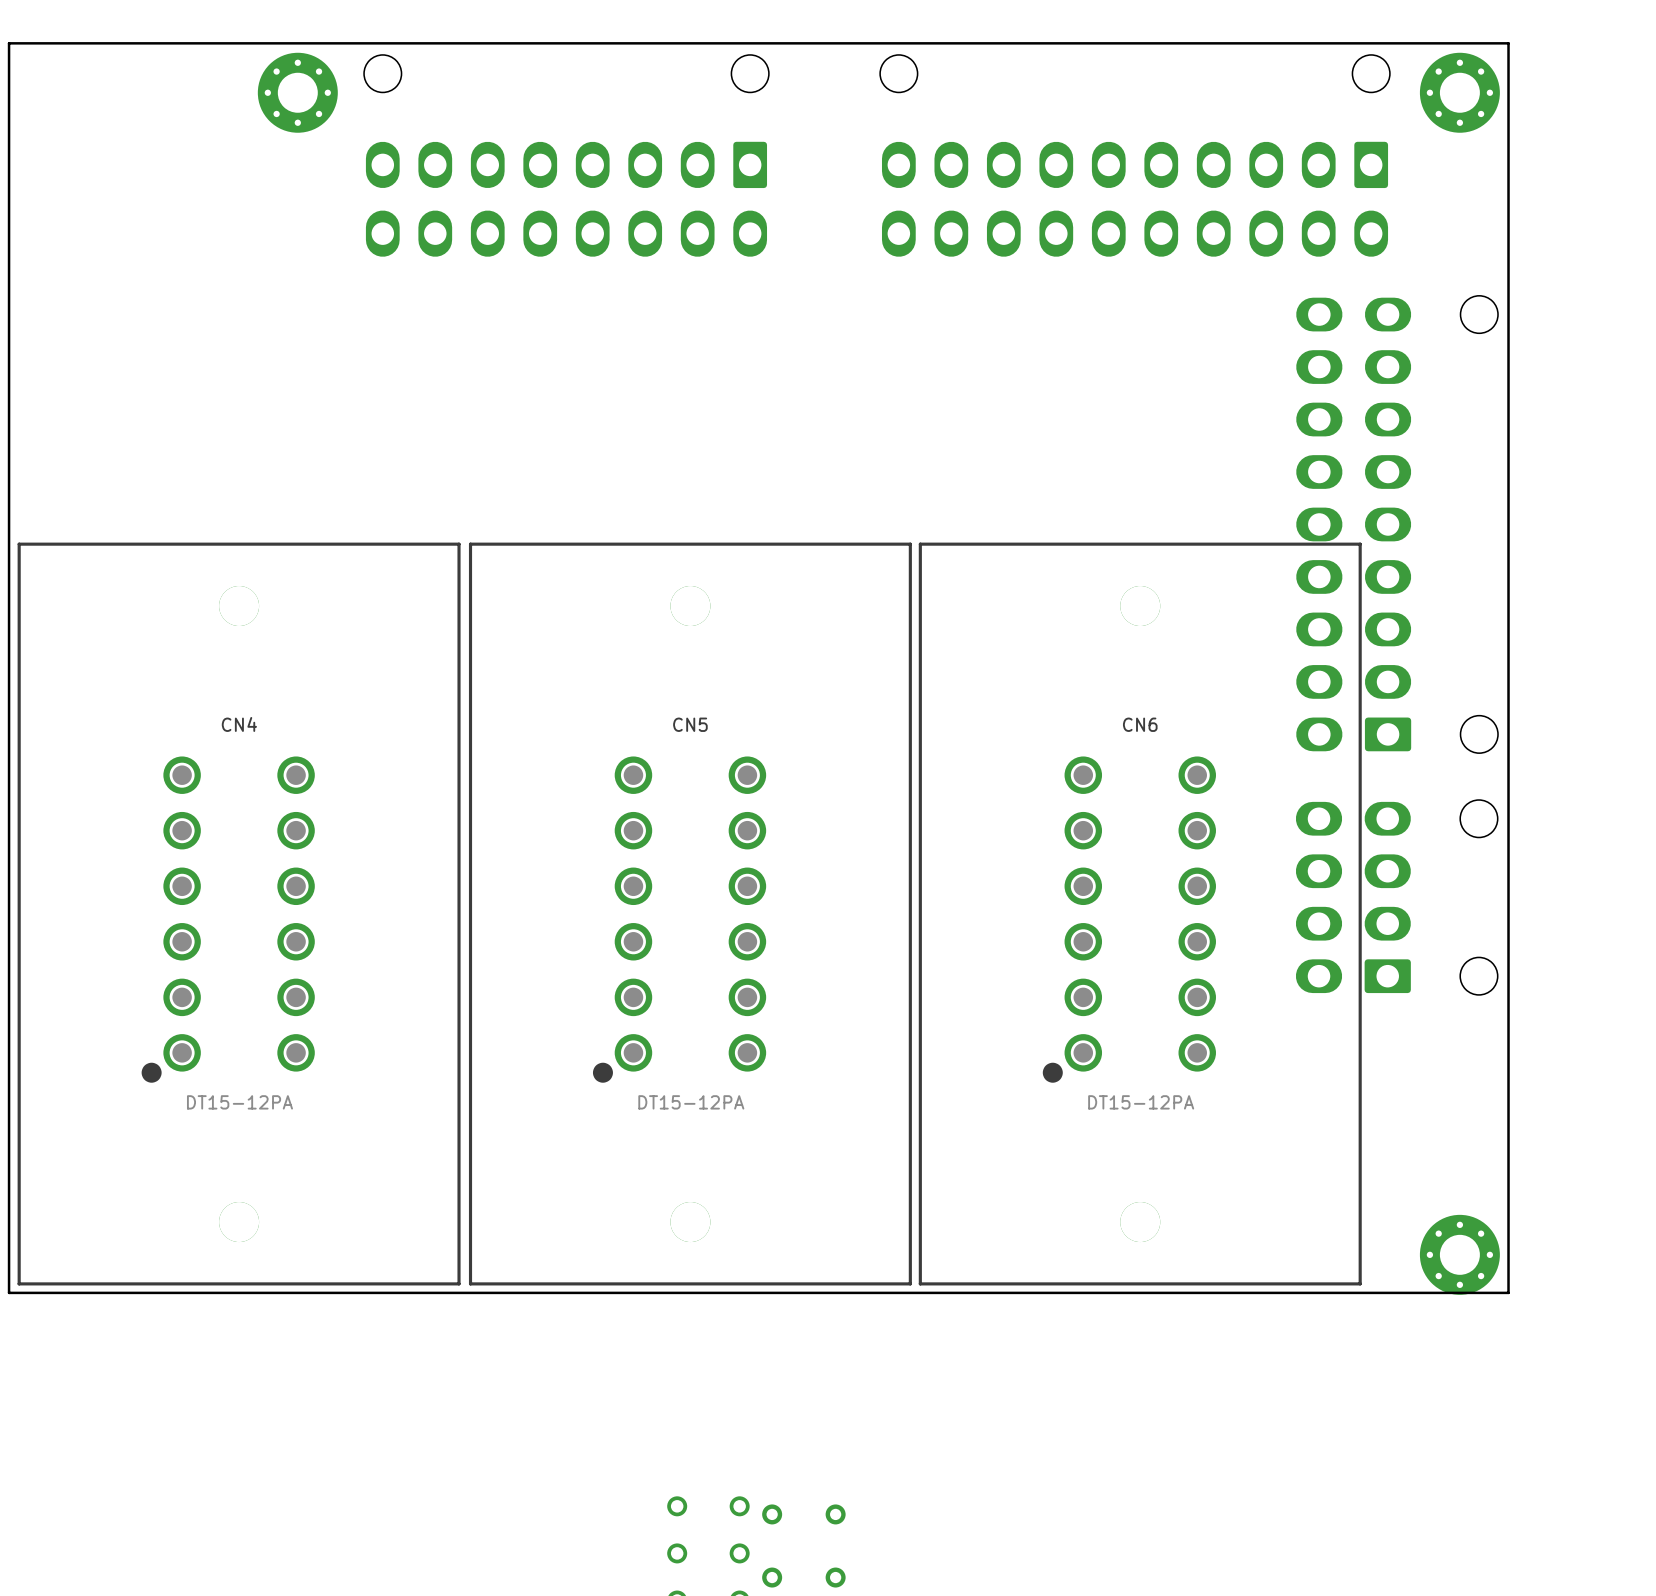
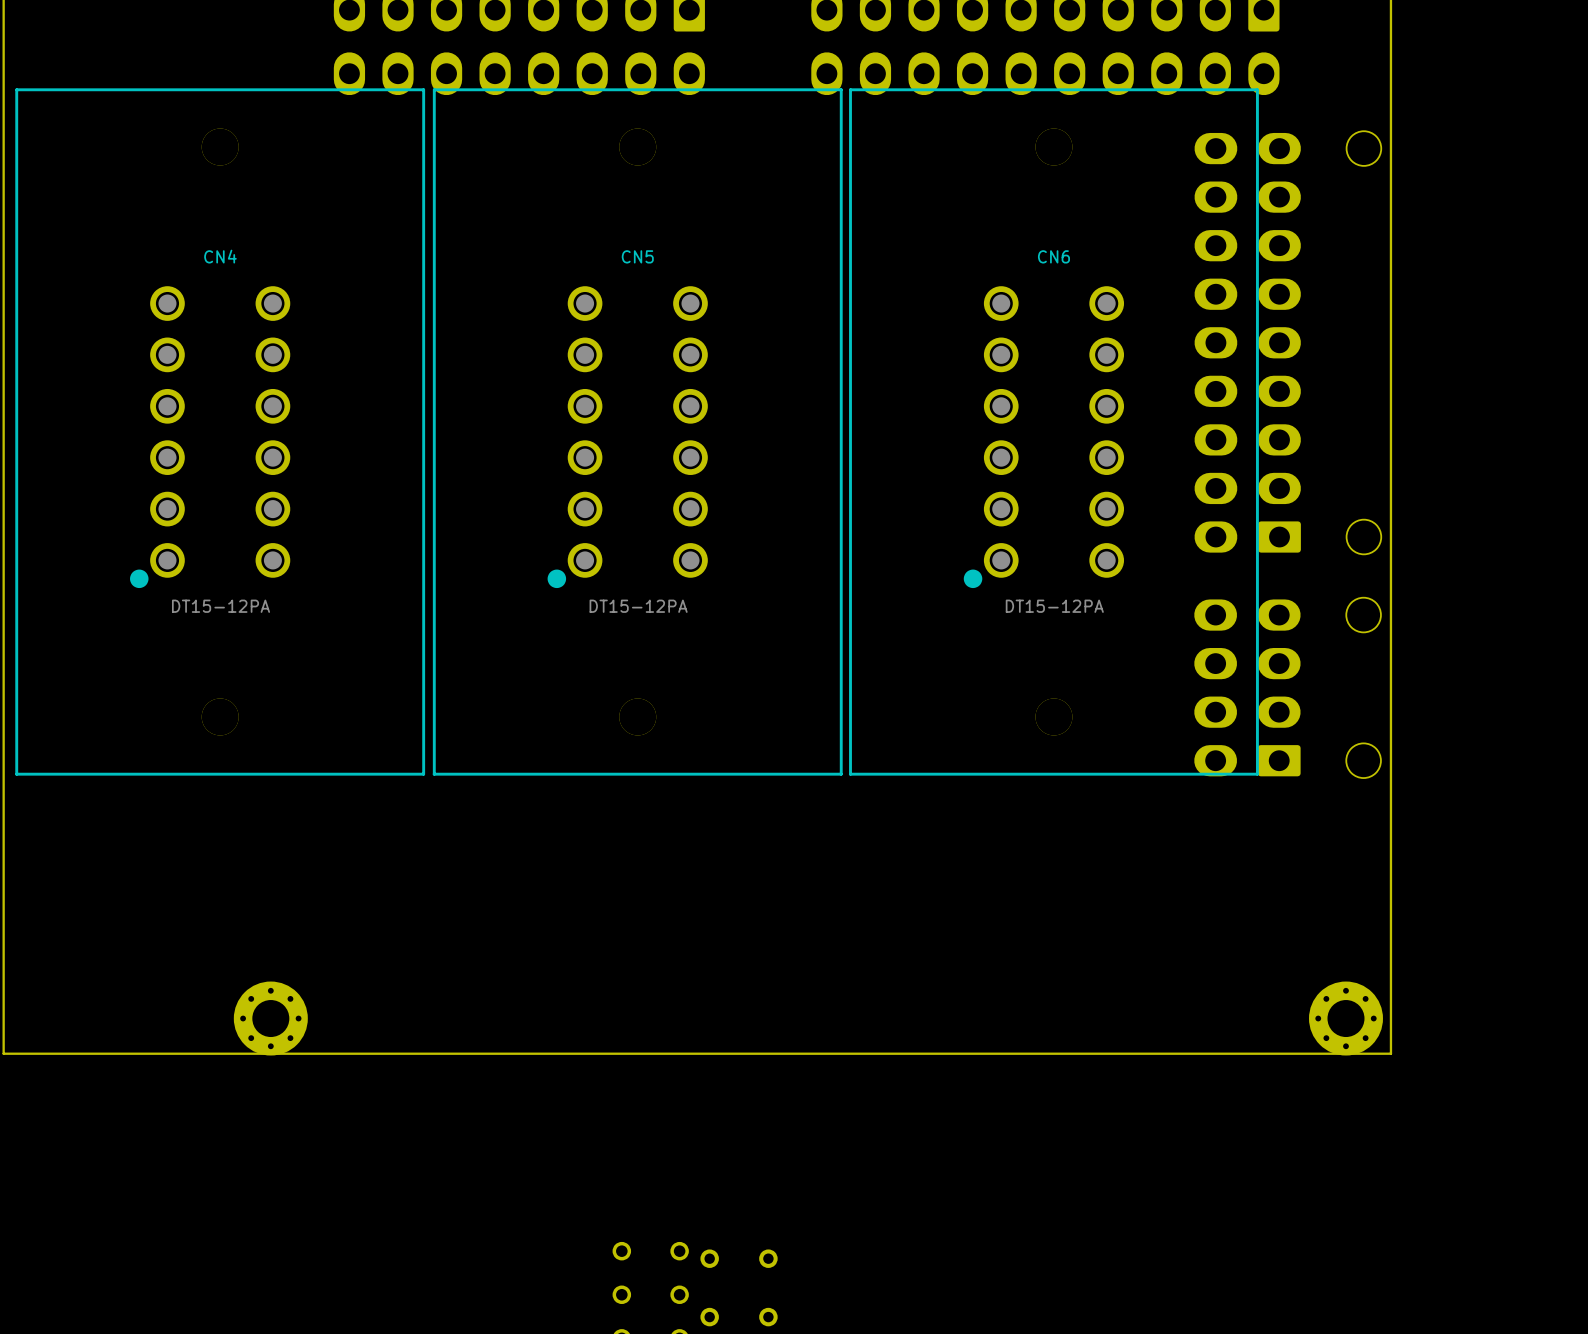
CN4 position: (239, 914) -> (220, 431)
CN5 position: (690, 914) -> (637, 431)
CN6 position: (1140, 914) -> (1053, 431)
part: none -> (270, 1018)

